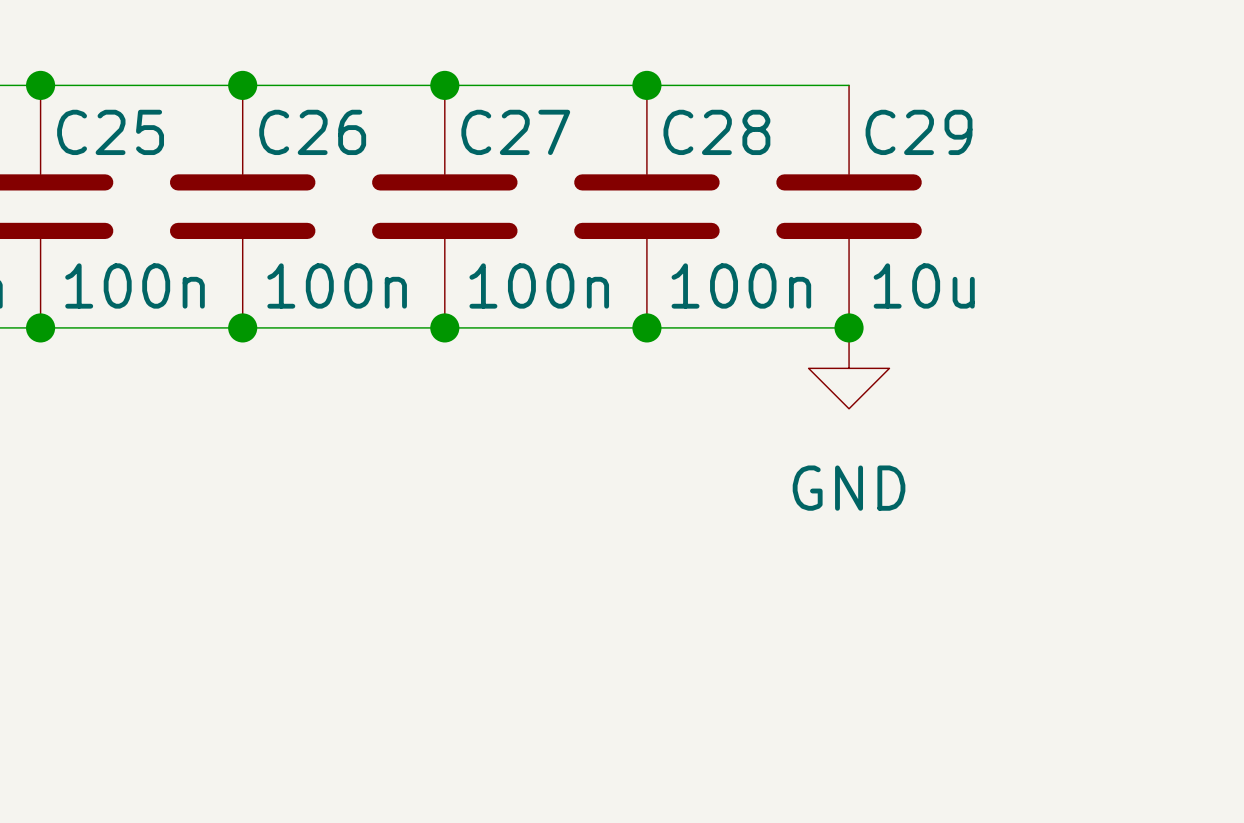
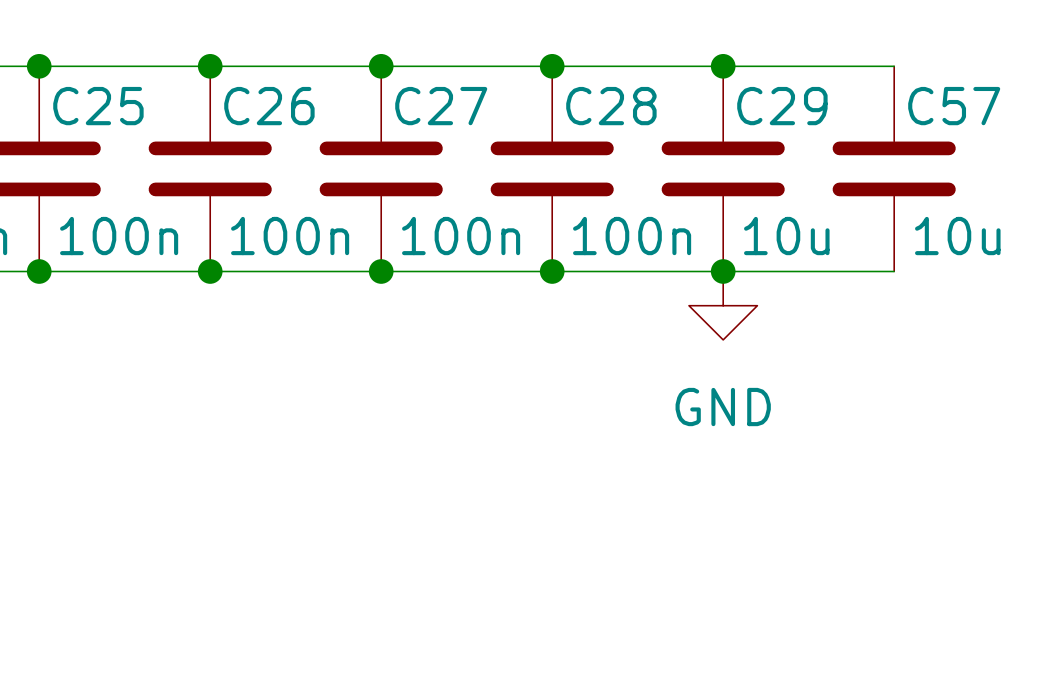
wire: none -> (723, 66) (894, 66)
junction: none -> (723, 66)
C57: none -> 10u (894, 168)
wire: none -> (723, 271) (894, 271)

